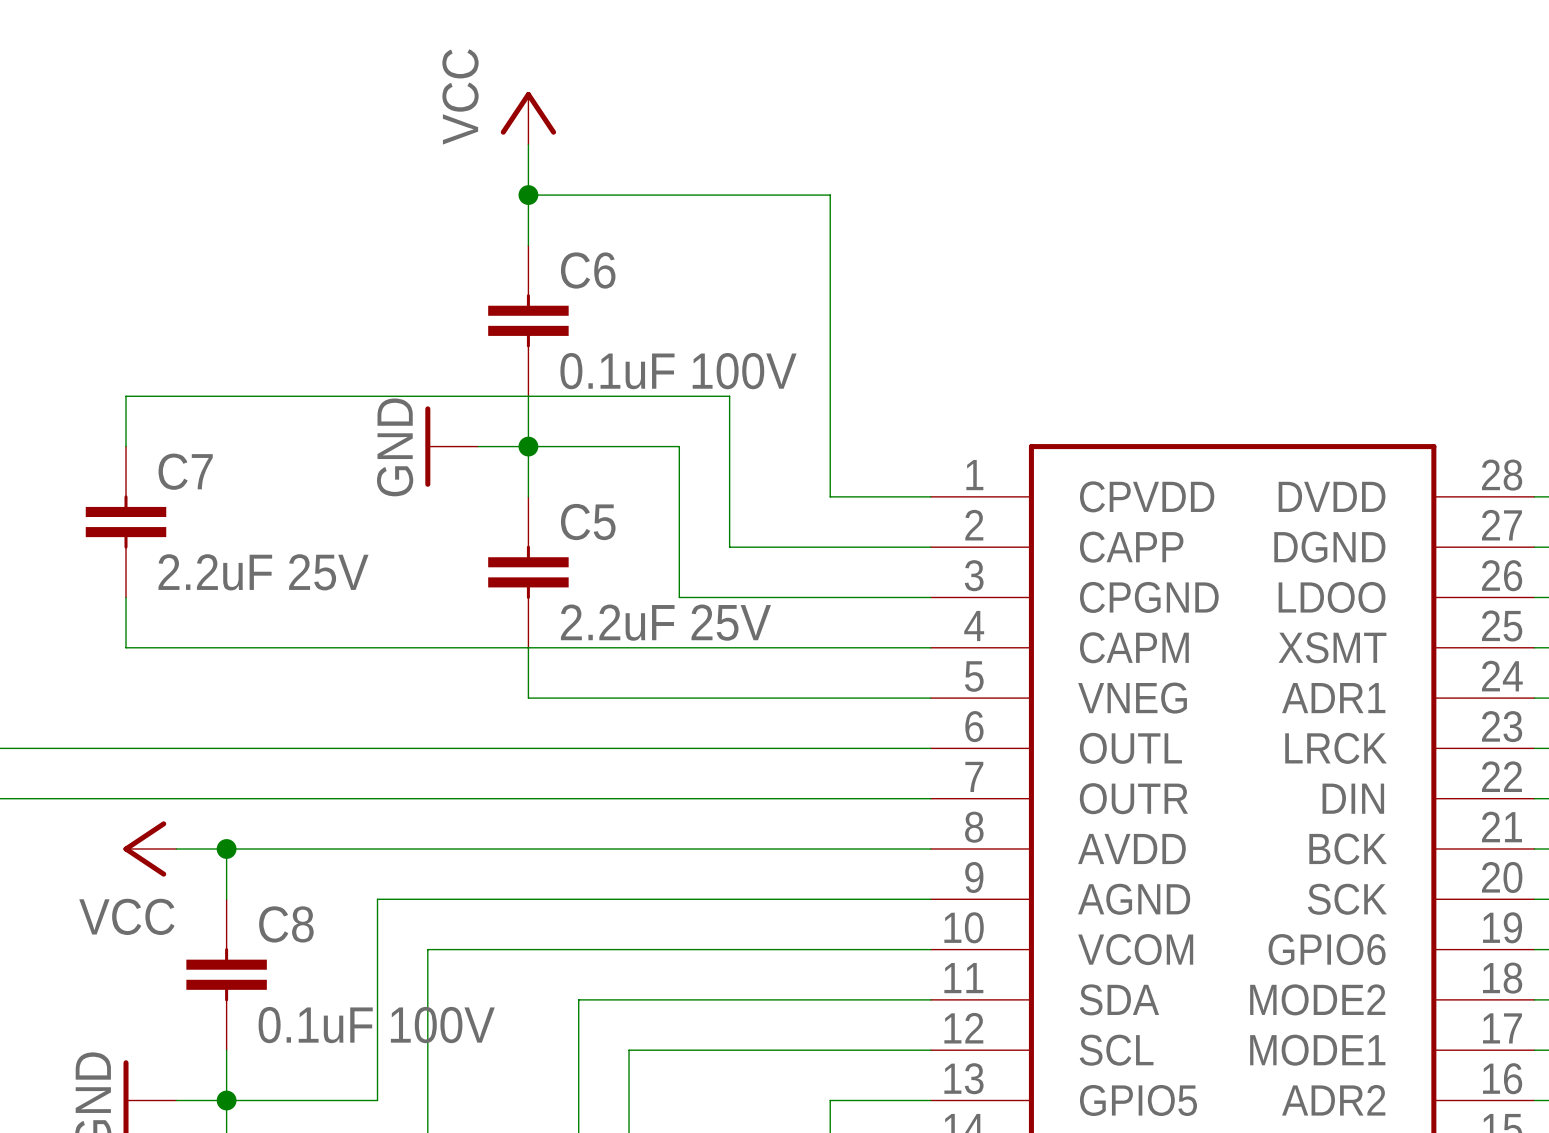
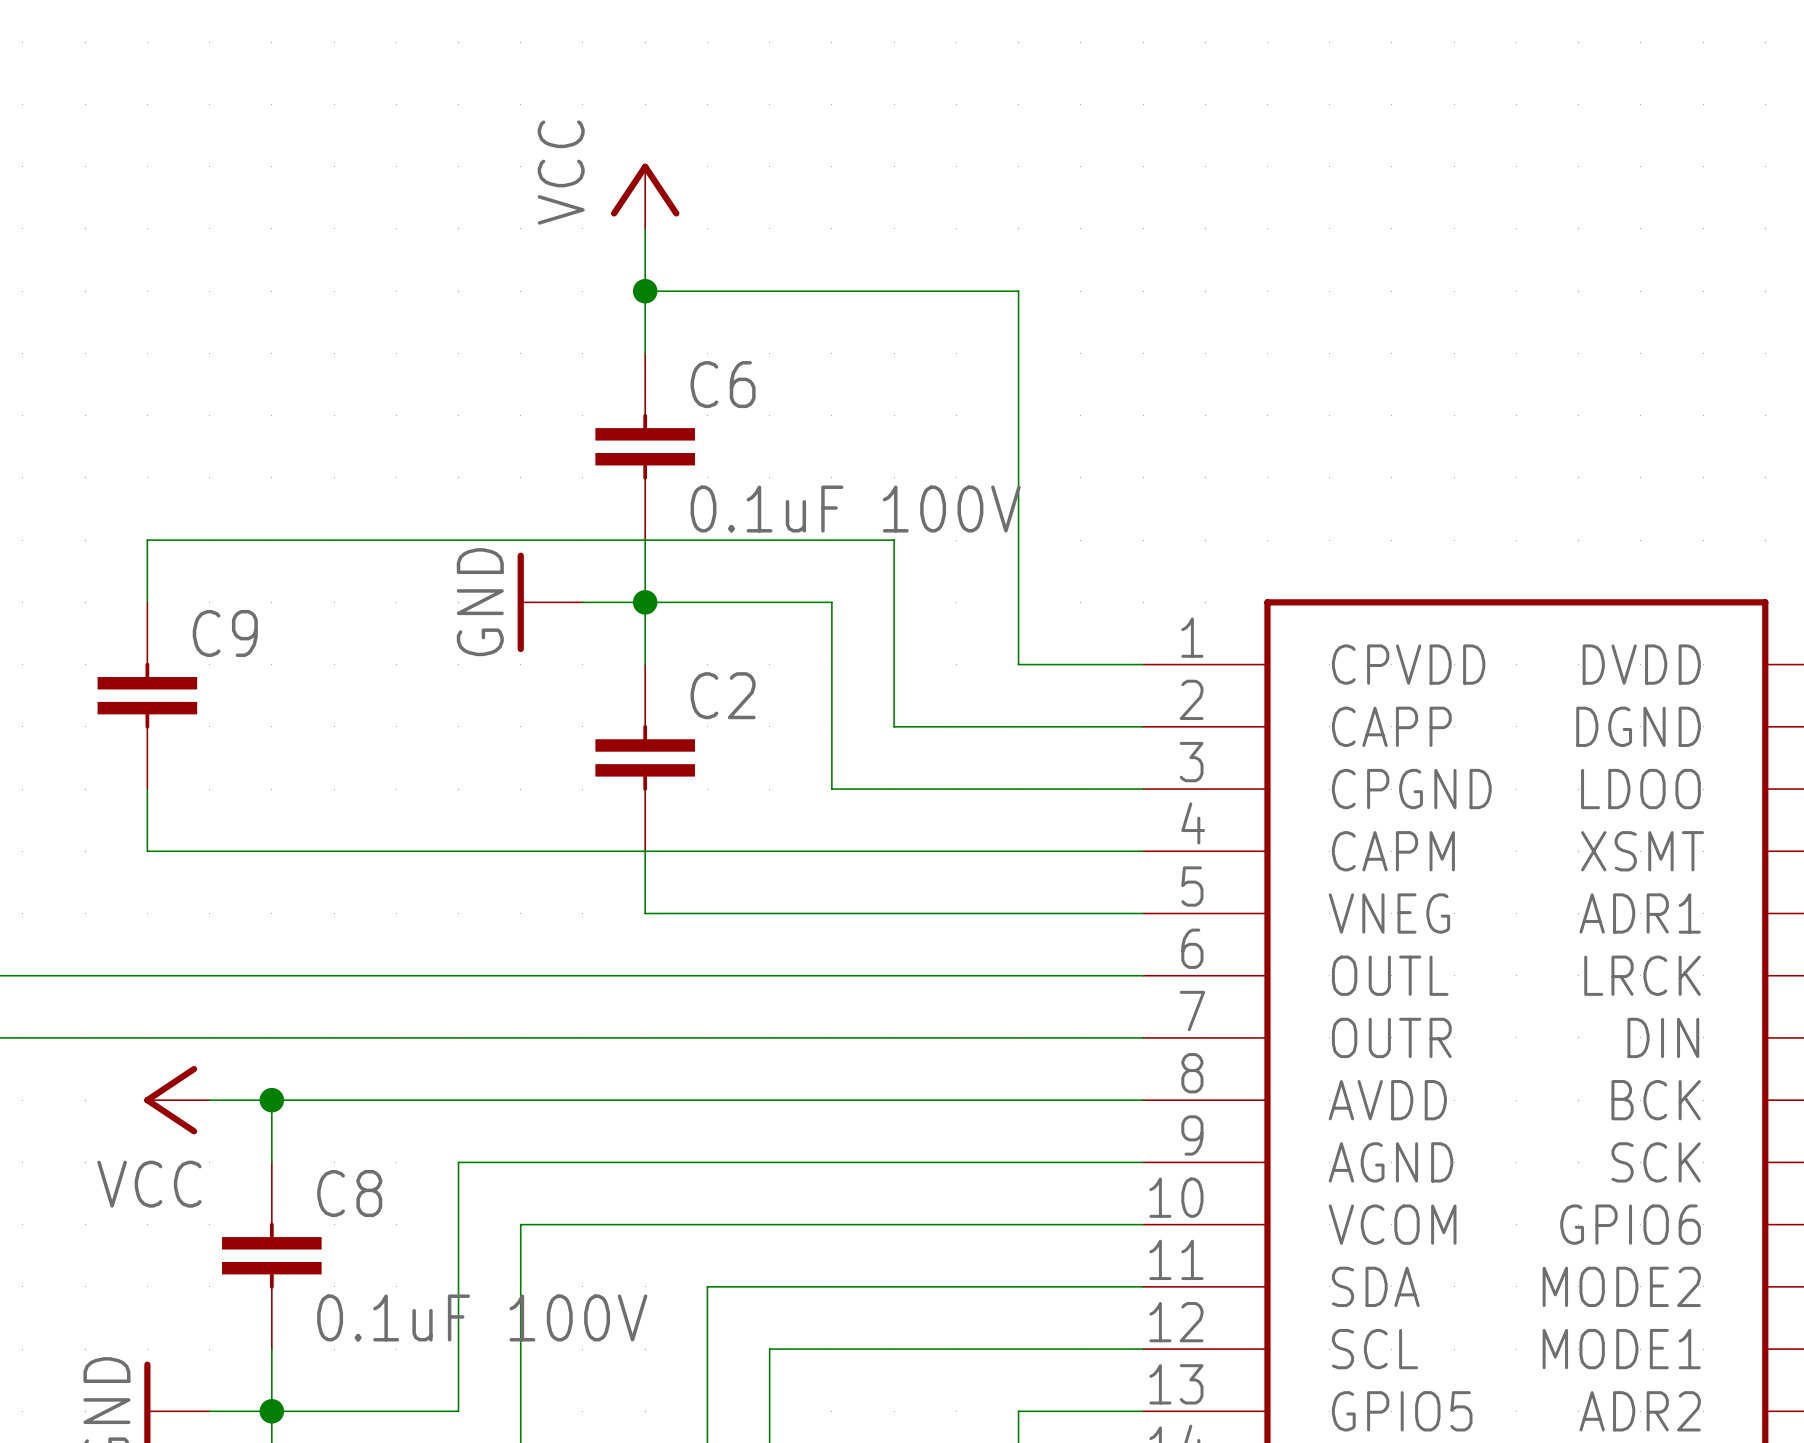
C7 name: C7 (185, 471) -> C9 (225, 633)
C5 name: C5 (588, 522) -> C2 (723, 695)
C7 value: 2.2uF 25V (263, 572) -> none
C5 value: 2.2uF 25V (665, 622) -> none

